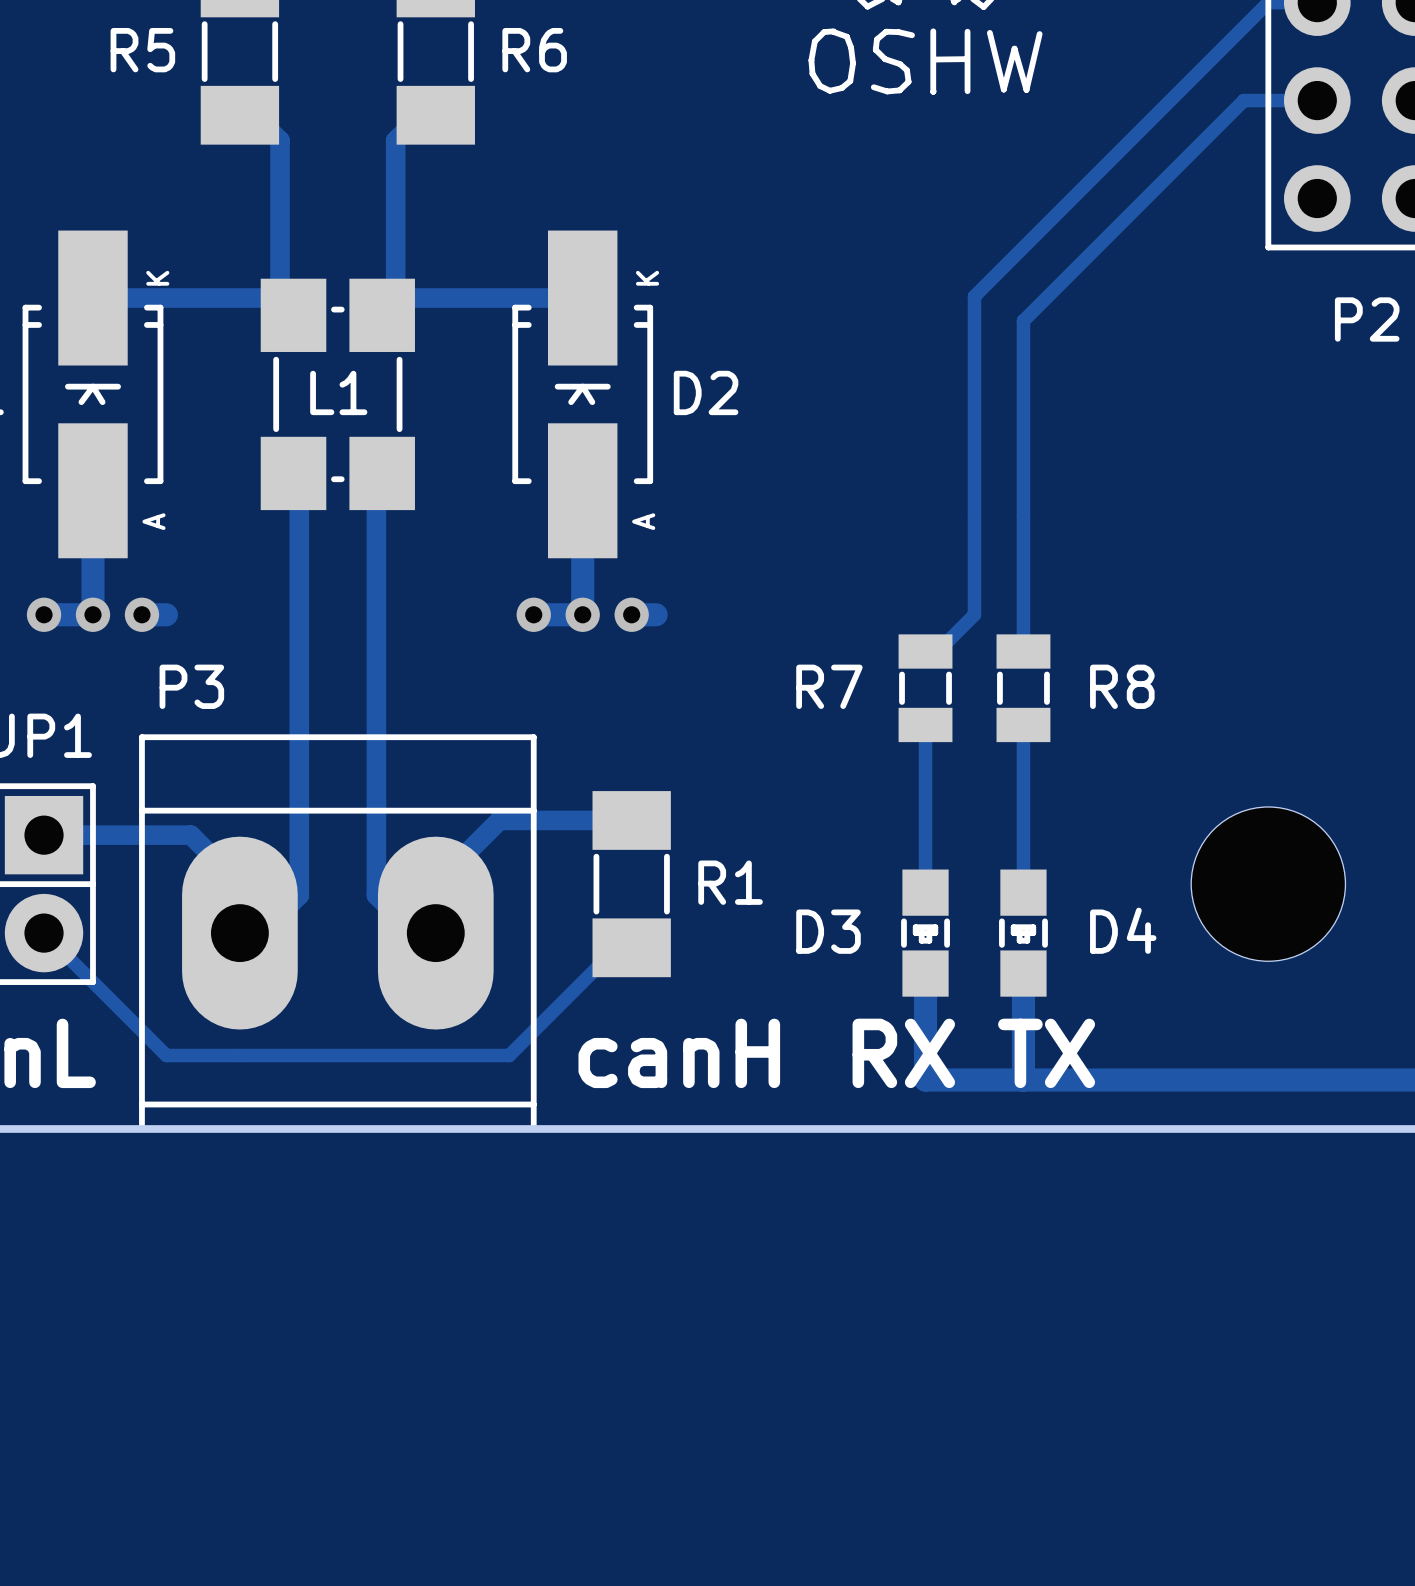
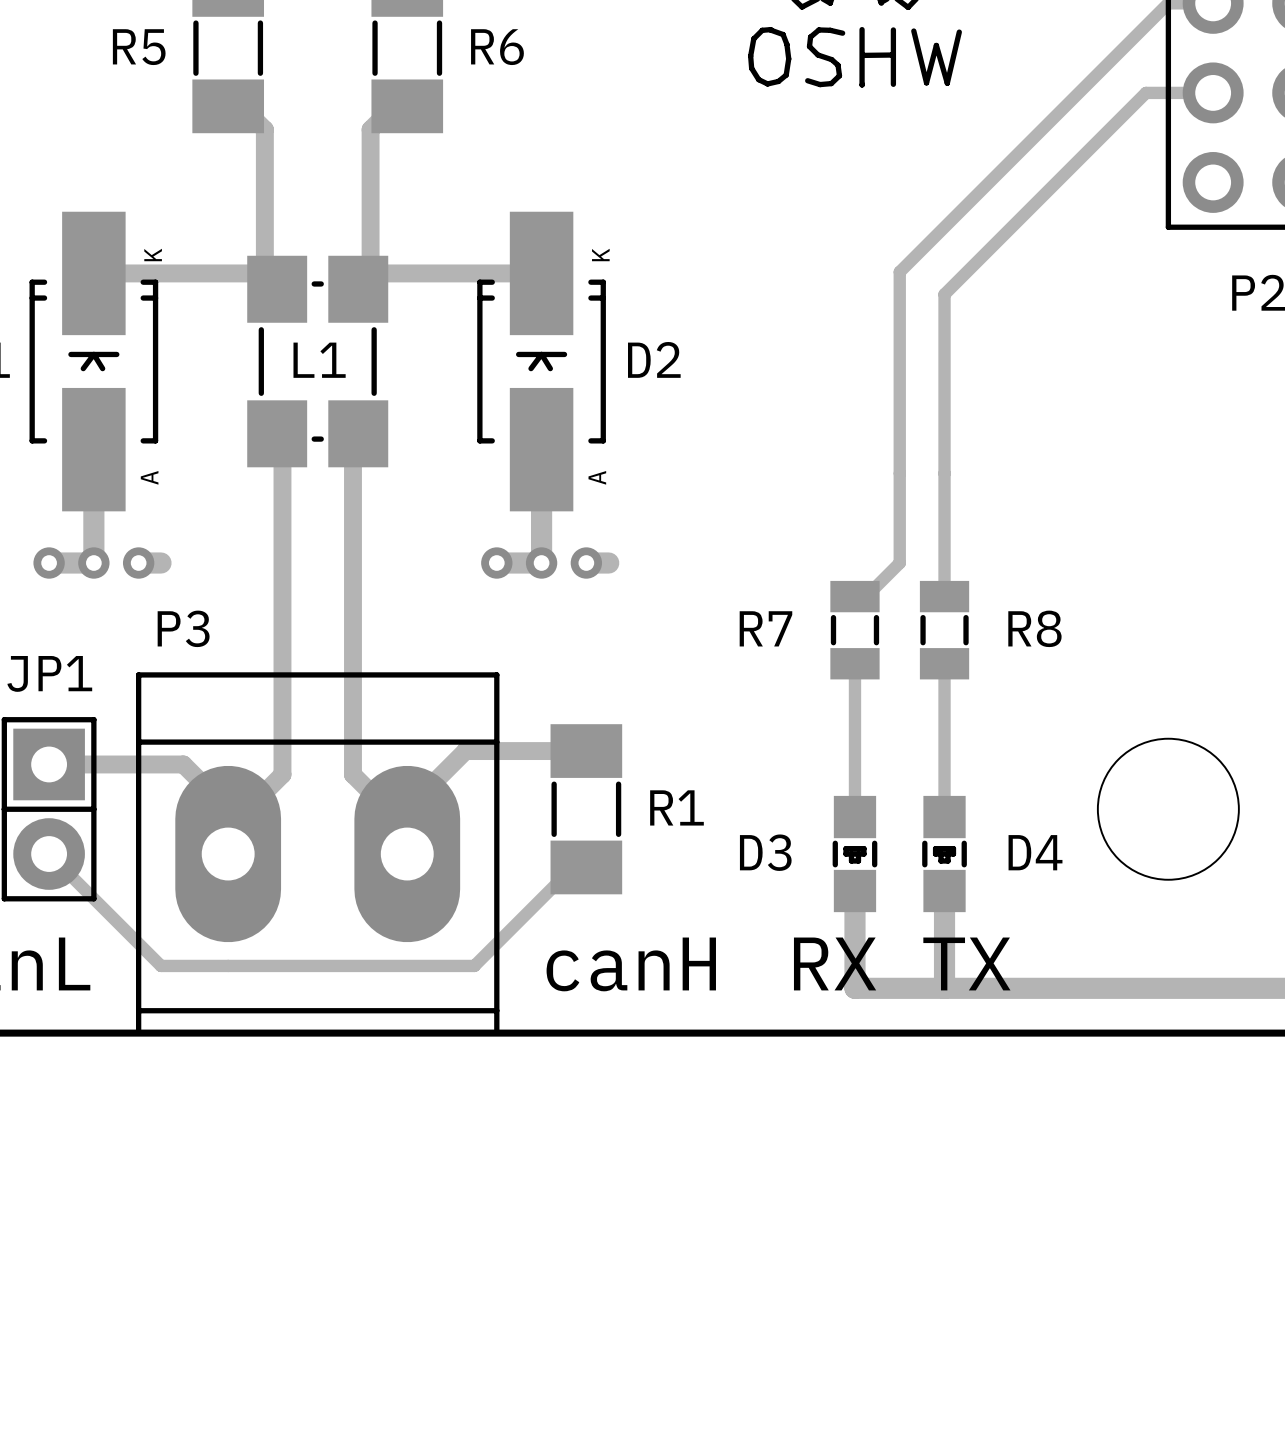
track: (299, 846) (299, 895) (261, 933) (261, 905) -> (282, 774) (247, 809) (247, 828)
track: (376, 846) (376, 895) (414, 933) (414, 905) -> (352, 774) (387, 809) (387, 828)

